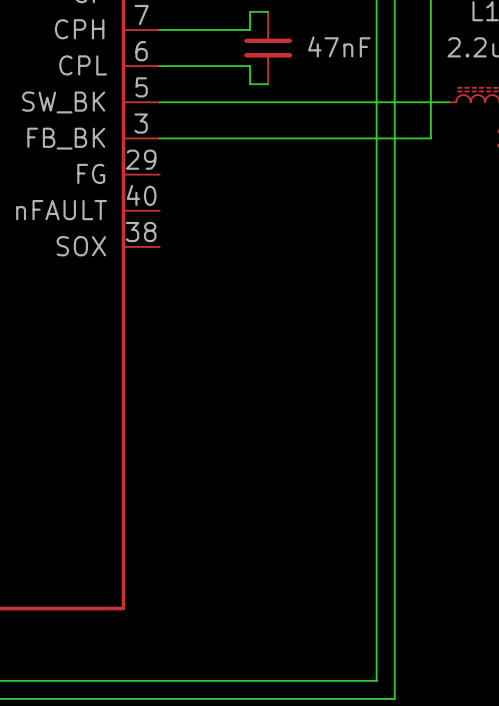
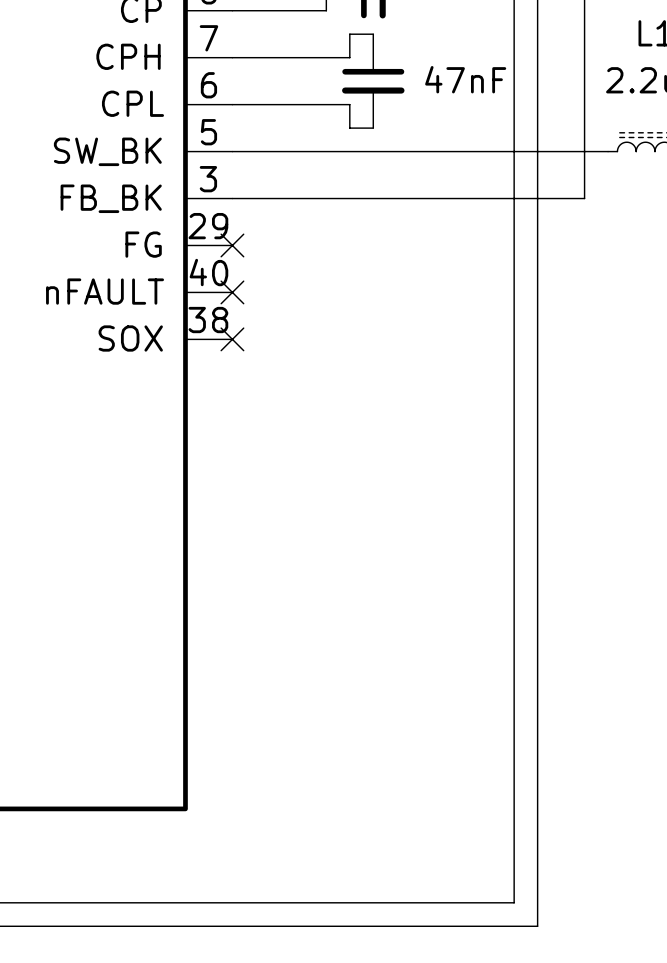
no-connect mark: none -> (232, 245)
no-connect mark: none -> (232, 292)
no-connect mark: none -> (232, 339)

